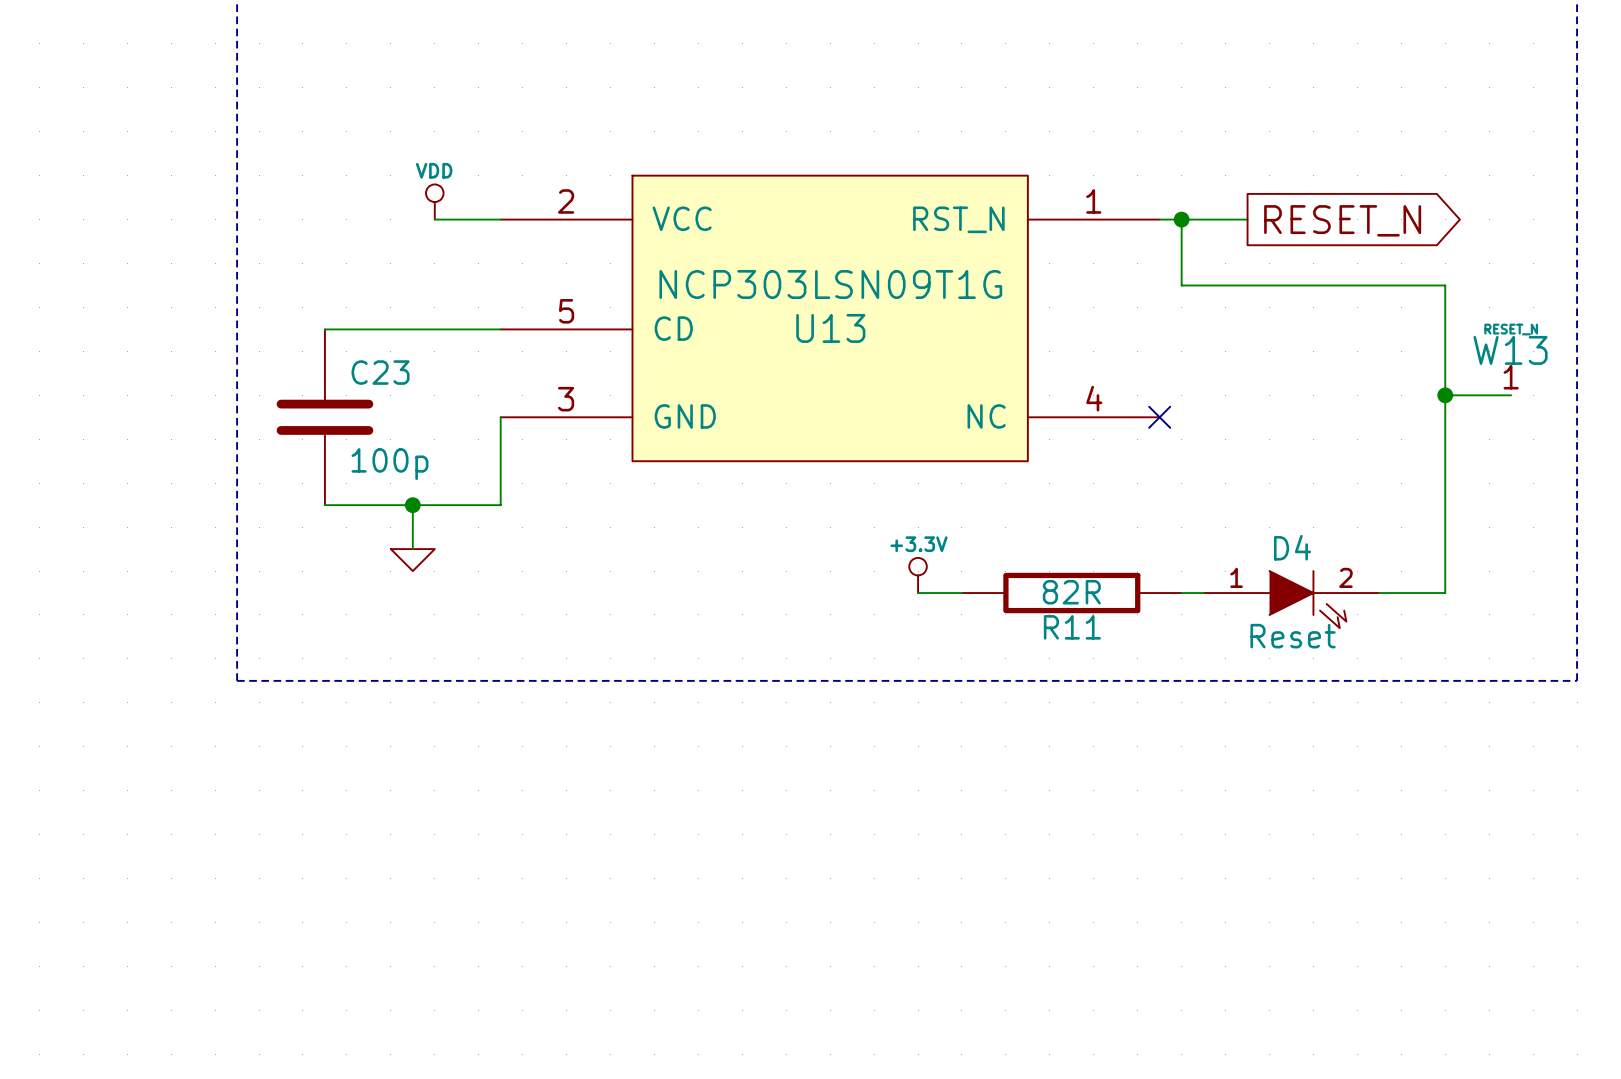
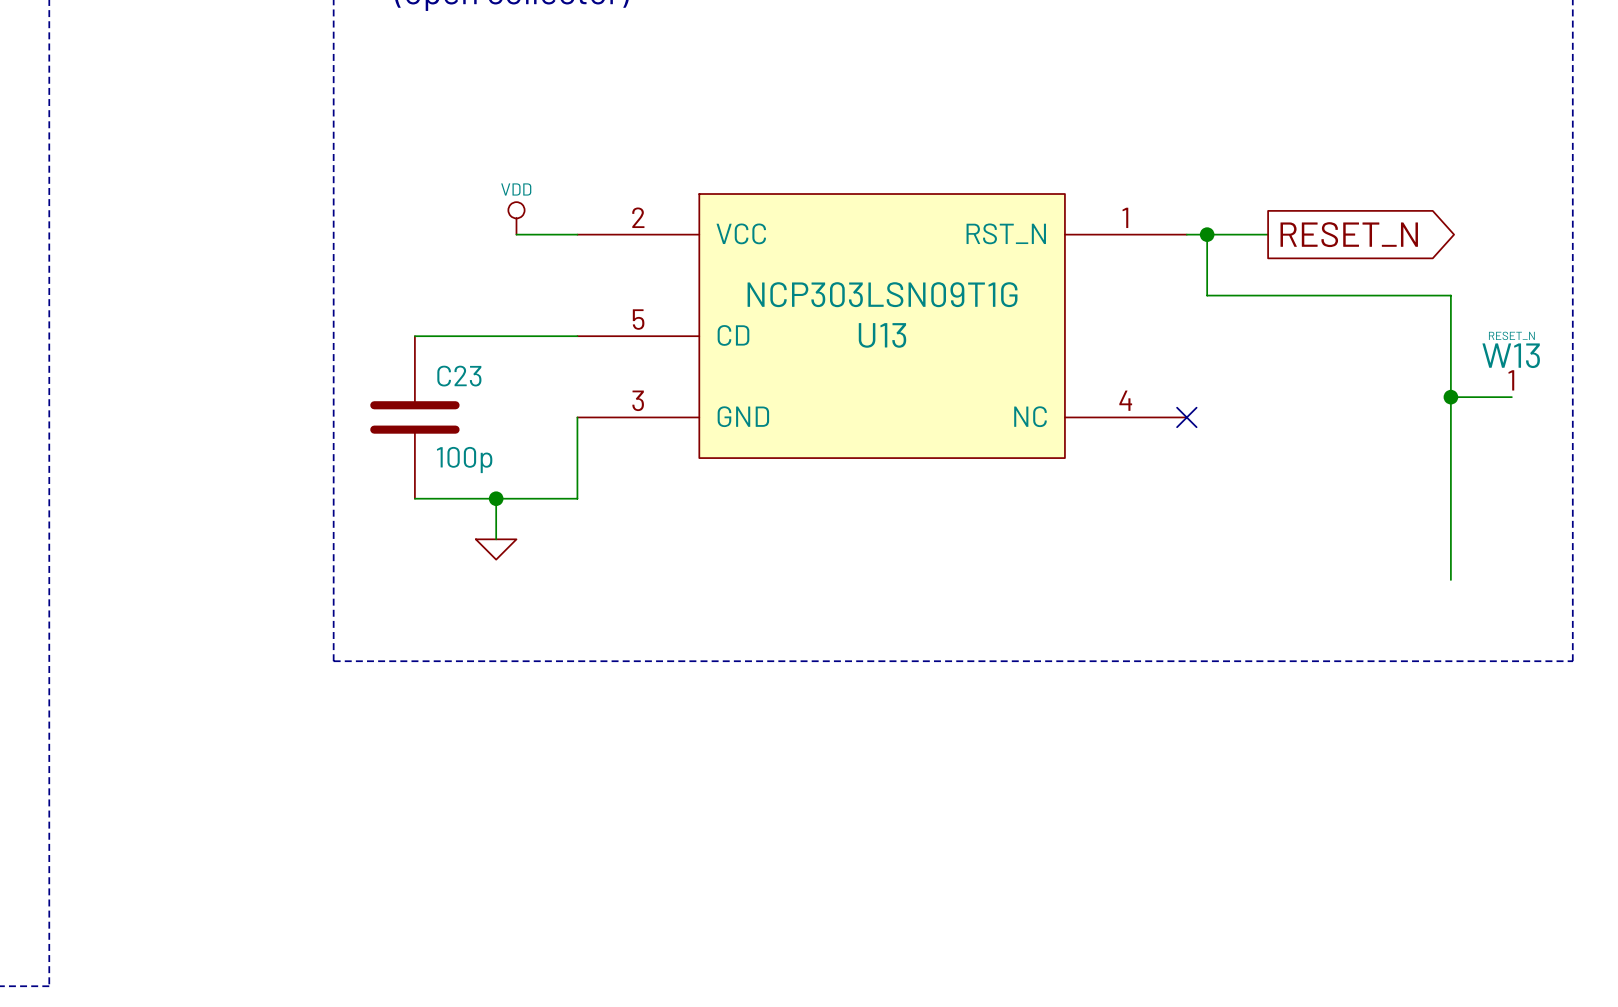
power symbol: +3.3V (918, 575) -> none
wire: (918, 593) (961, 593) -> none
R11: 82R (1071, 593) -> none
wire: (1181, 593) (1203, 593) -> none
wire: (1379, 593) (1445, 593) -> none
D4: Reset (1291, 599) -> none

